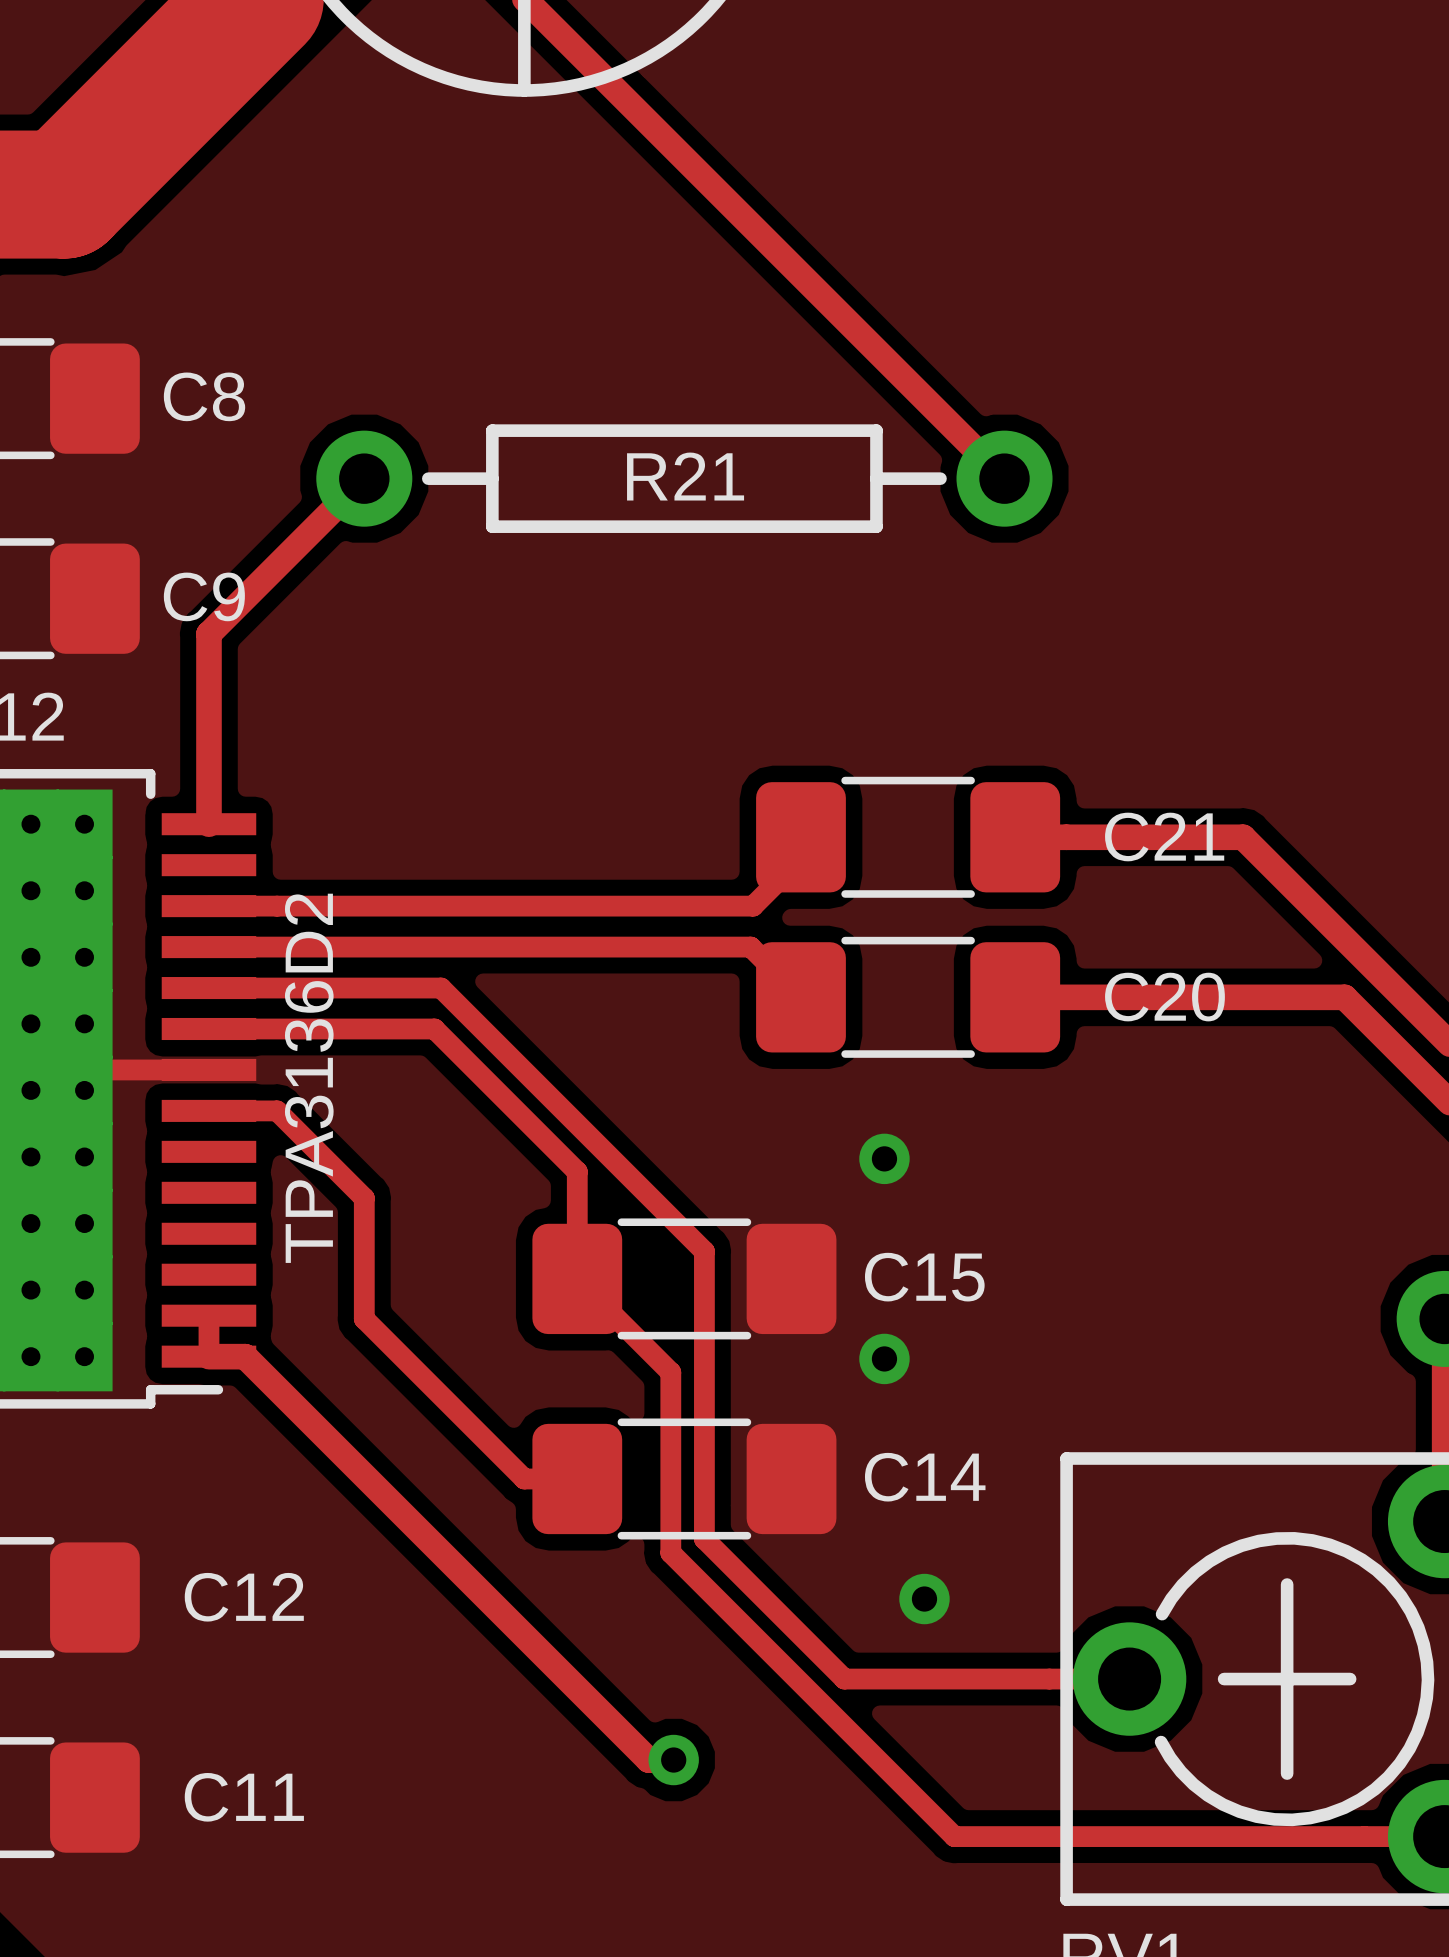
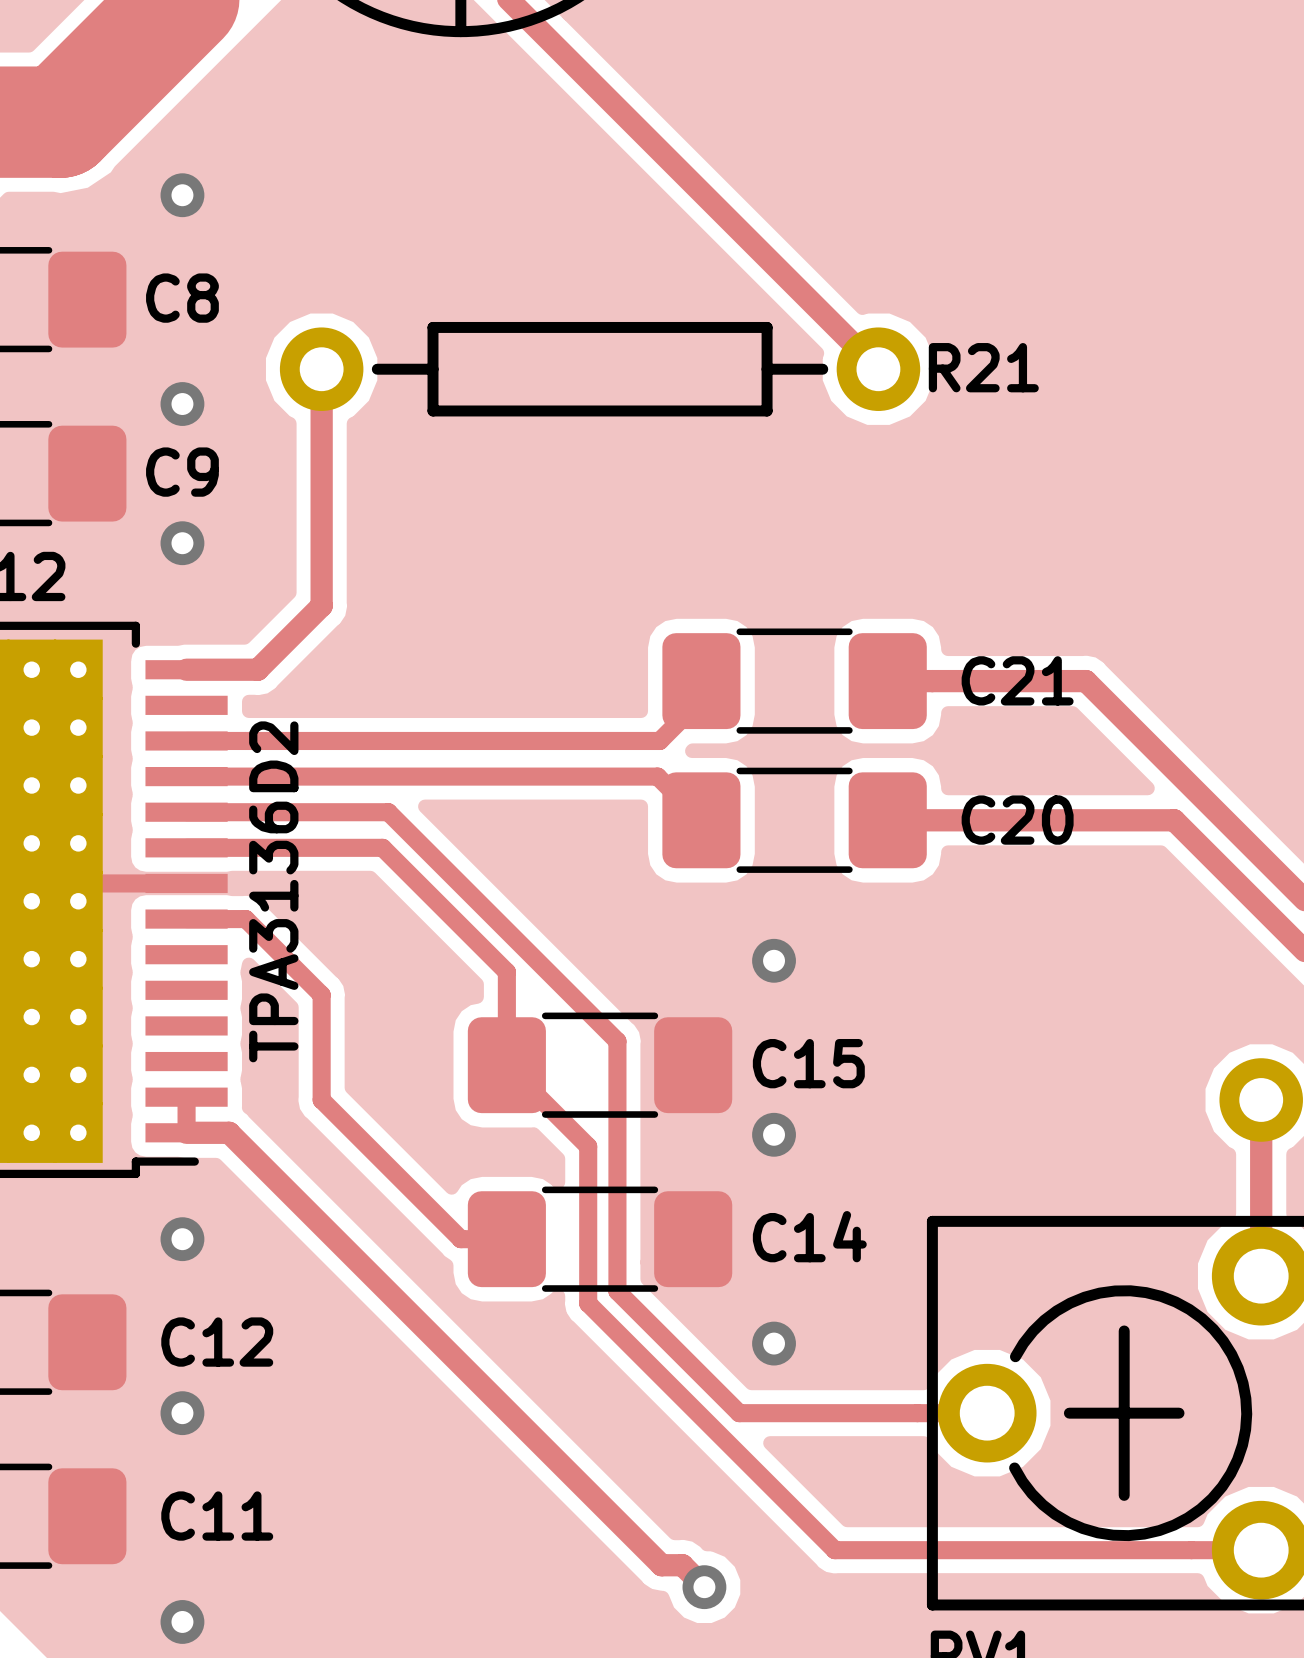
via: none -> (182, 195)
R21 name position: R21 (685, 476) -> R21 (983, 367)
track: (364, 478) (208, 633) (208, 824) -> (321, 369) (321, 605) (257, 669) (186, 669)
via: none -> (182, 404)
via: none -> (182, 543)
track: (245, 1356) (648, 1760) (673, 1760) -> (218, 1132) (229, 1132) (661, 1565) (682, 1565) (704, 1587)
via: none -> (182, 1239)
via position: (924, 1599) -> (774, 1343)
via: none -> (182, 1413)
via: (673, 1760) -> none
via: none -> (704, 1587)
via: none -> (182, 1621)

